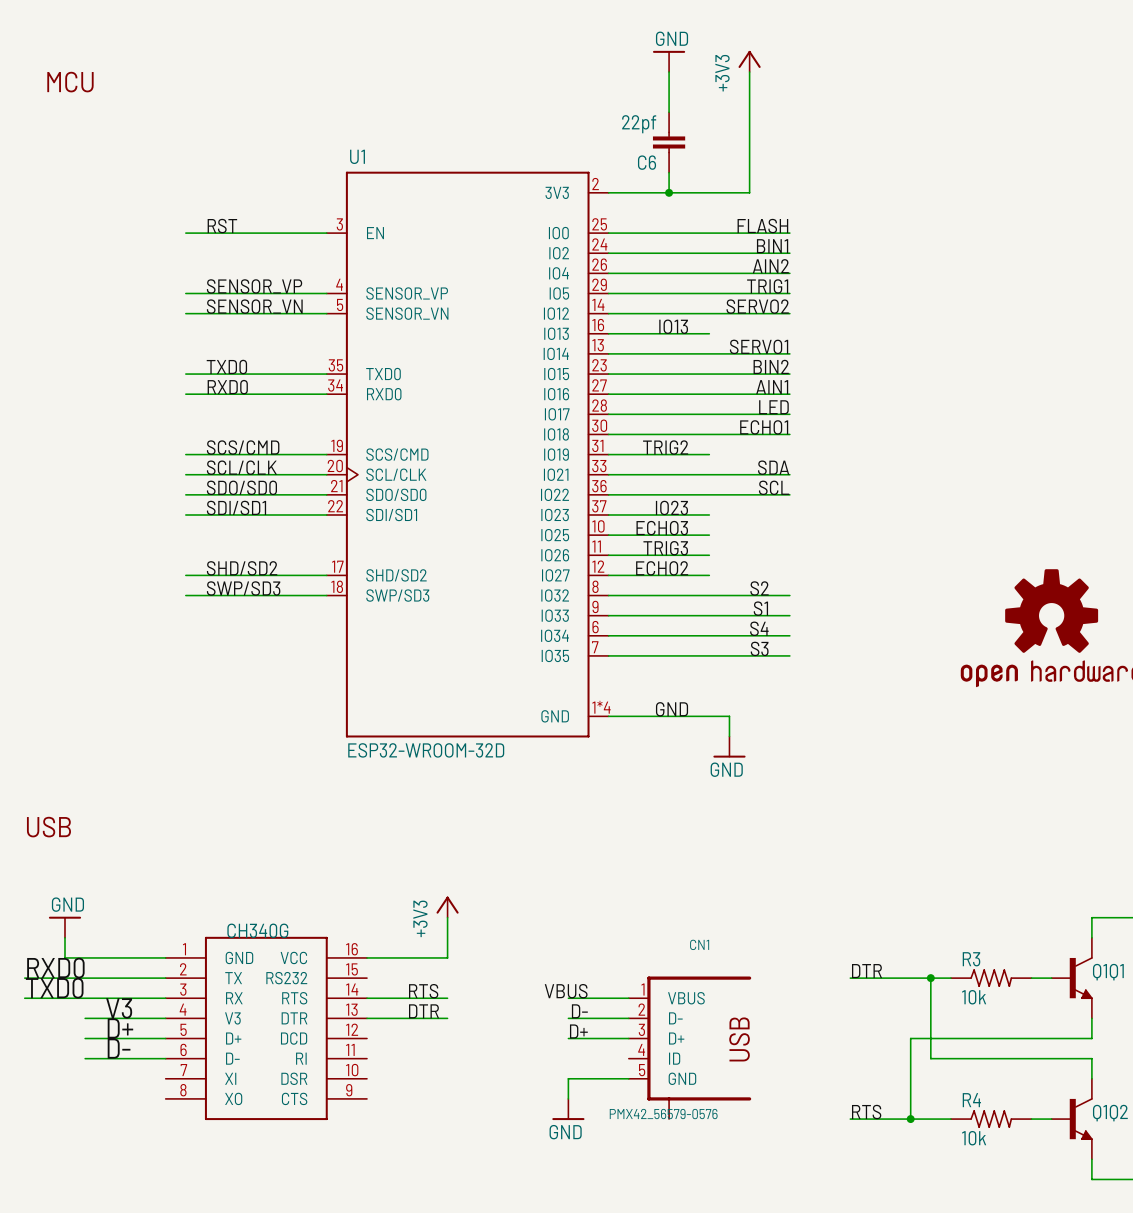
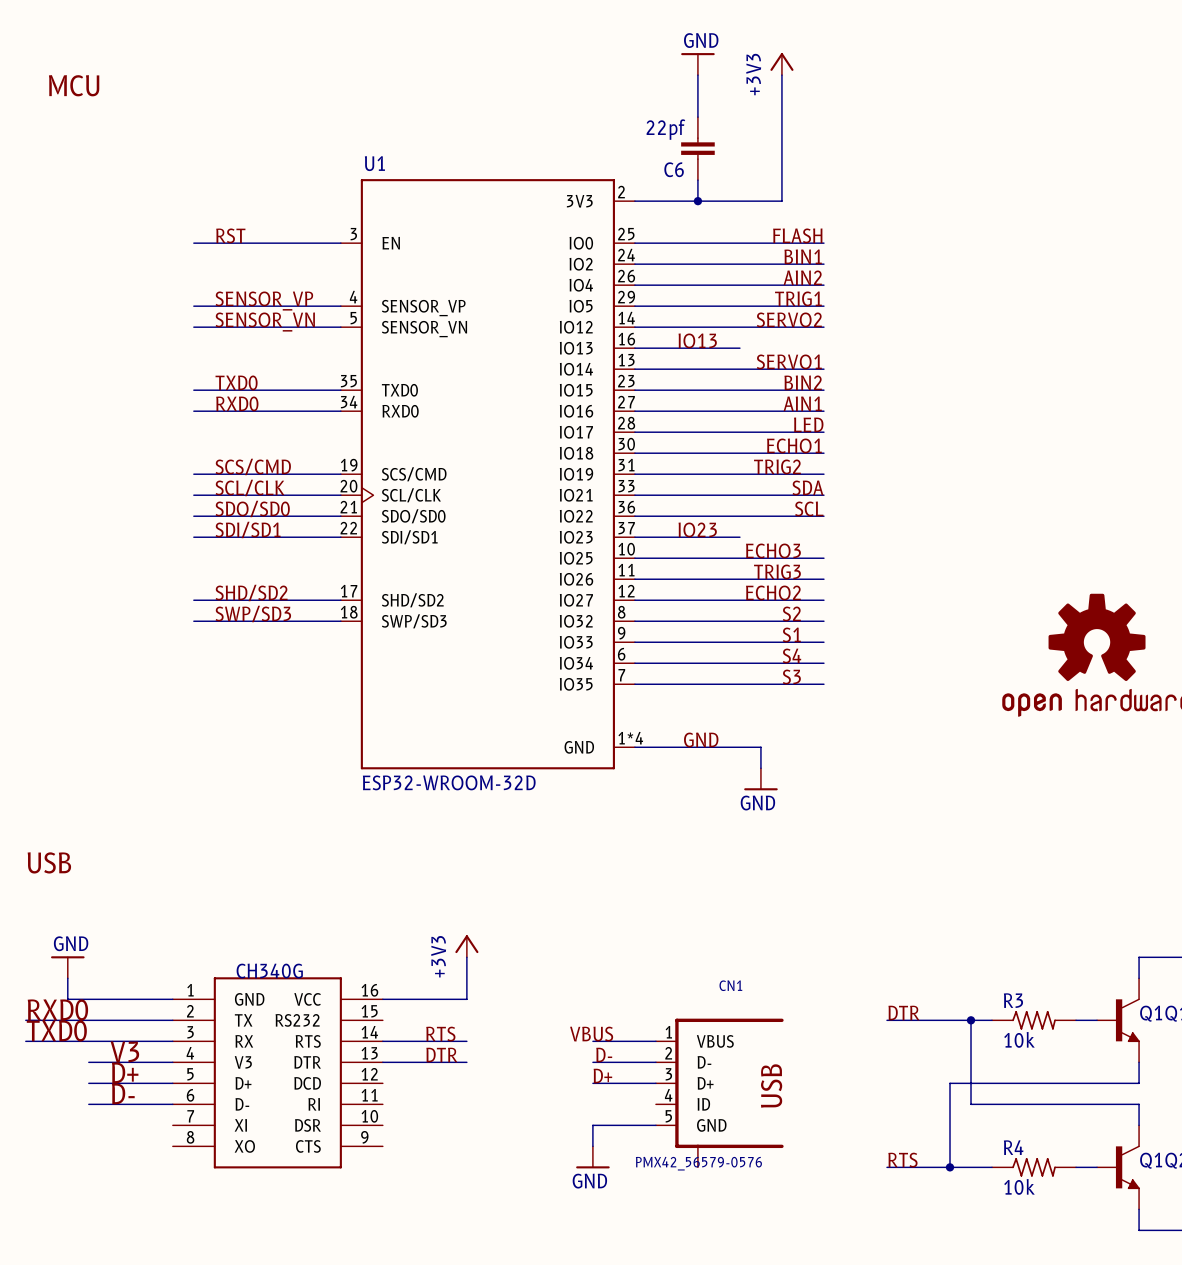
label position: TRIG2 (665, 447) -> TRIG2 (777, 466)
wire: none -> (739, 474) (823, 474)
label position: ECHO3 (662, 528) -> ECHO3 (773, 550)
wire: none -> (739, 558) (823, 558)
label position: TRIG3 (665, 548) -> TRIG3 (777, 571)
wire: none -> (739, 579) (823, 579)
label position: ECHO2 (662, 568) -> ECHO2 (773, 592)
wire: none -> (739, 600) (823, 600)

